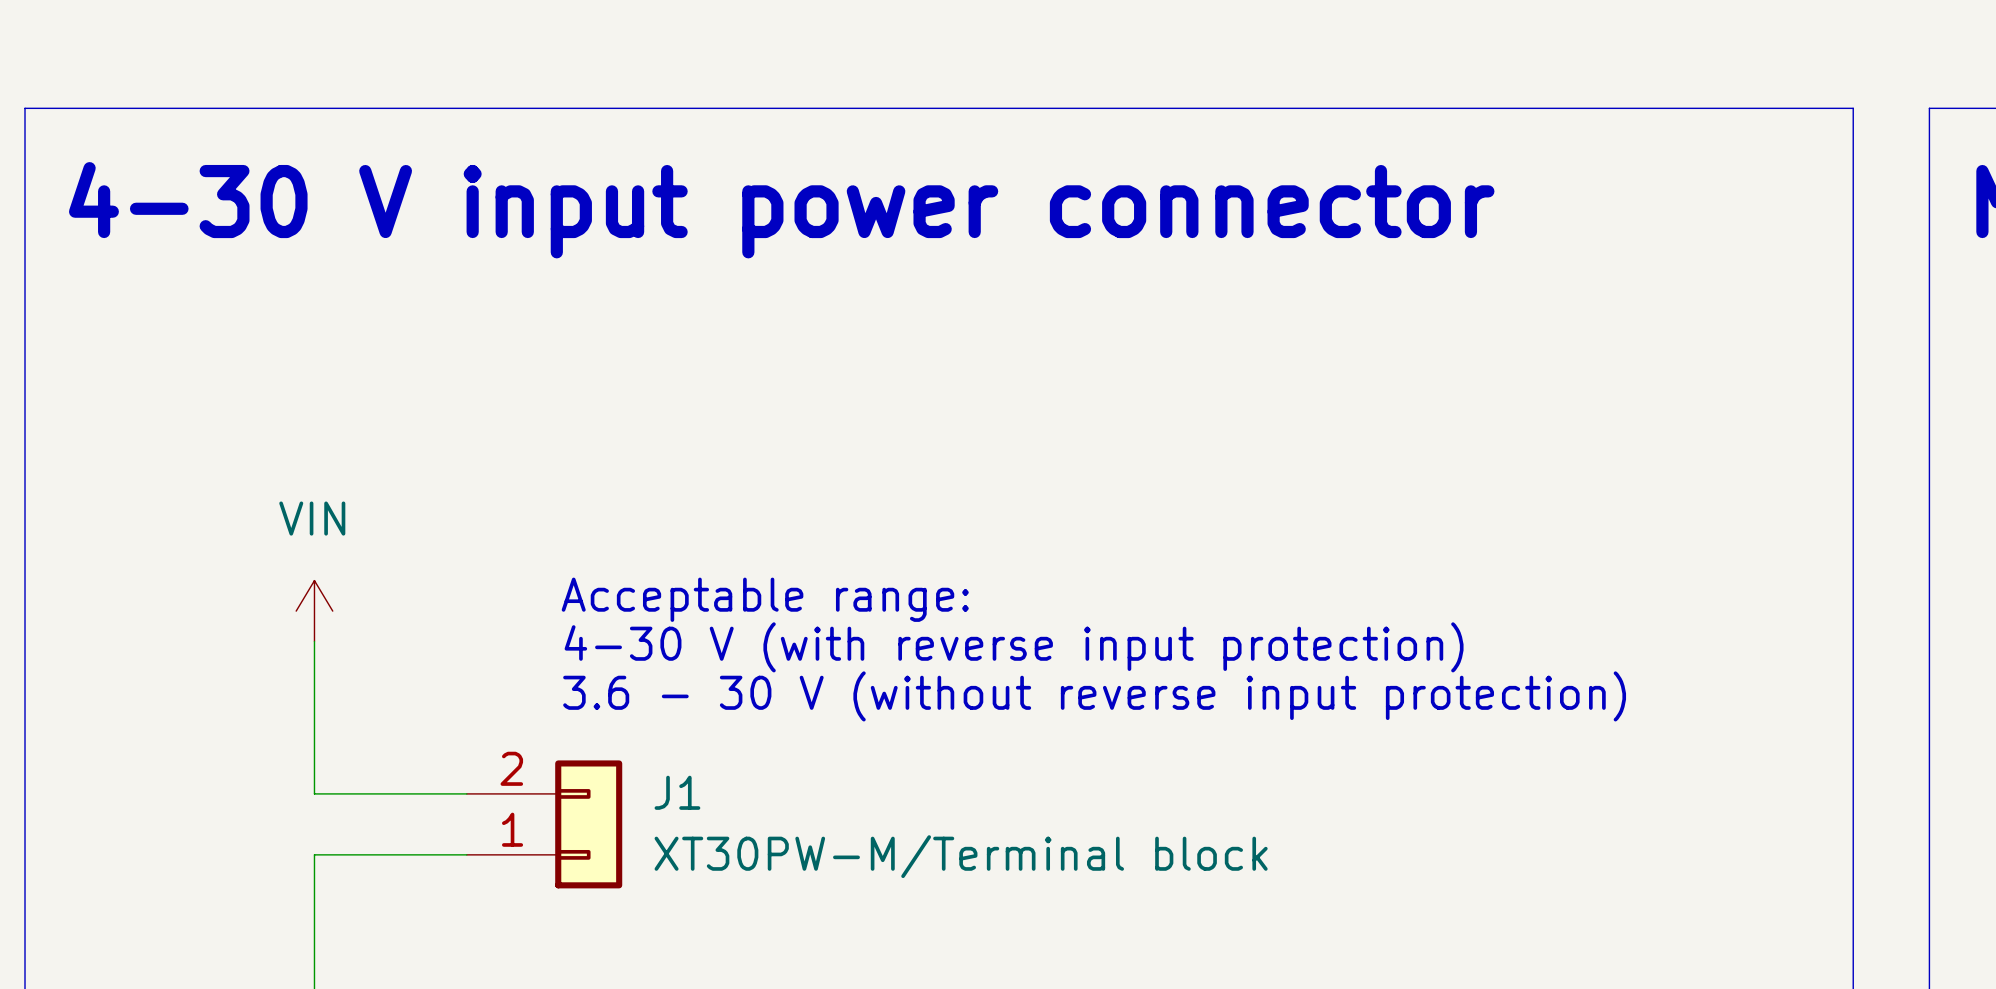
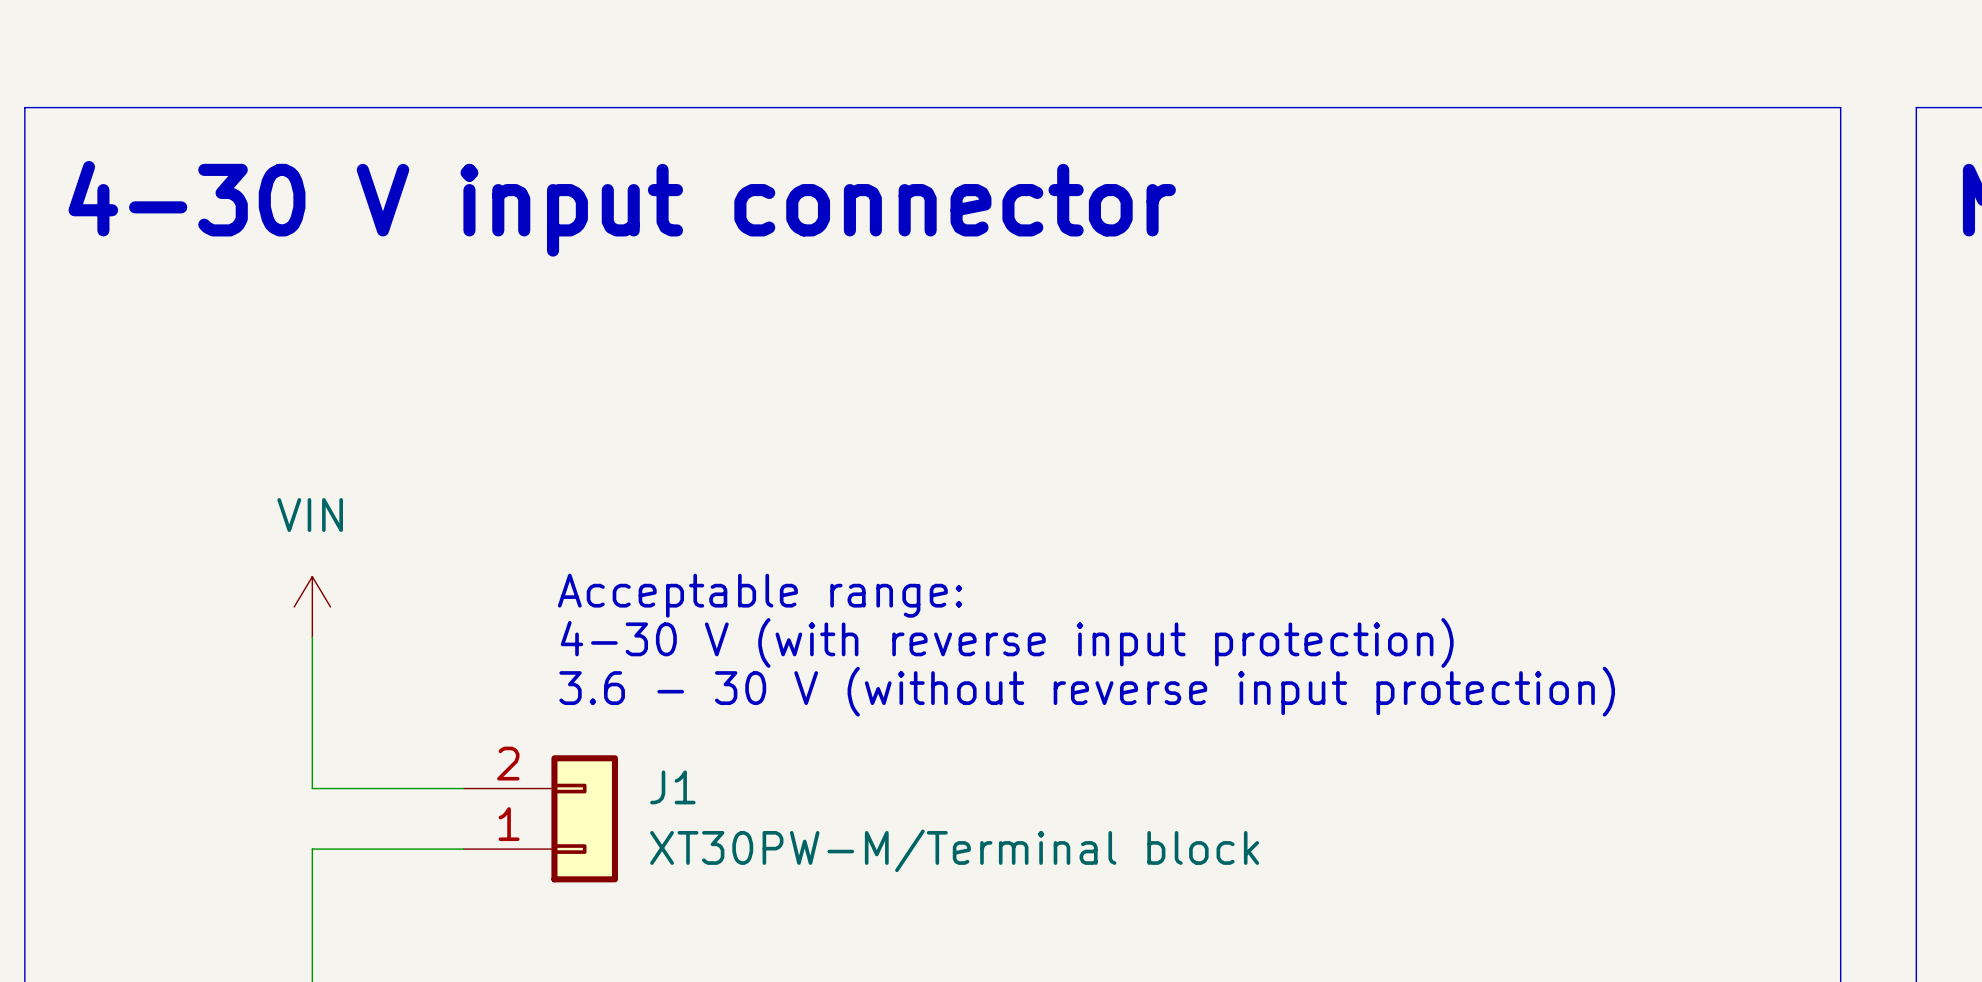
text: 4-30 V input power connector (781, 210) -> 4-30 V input connector (622, 208)

